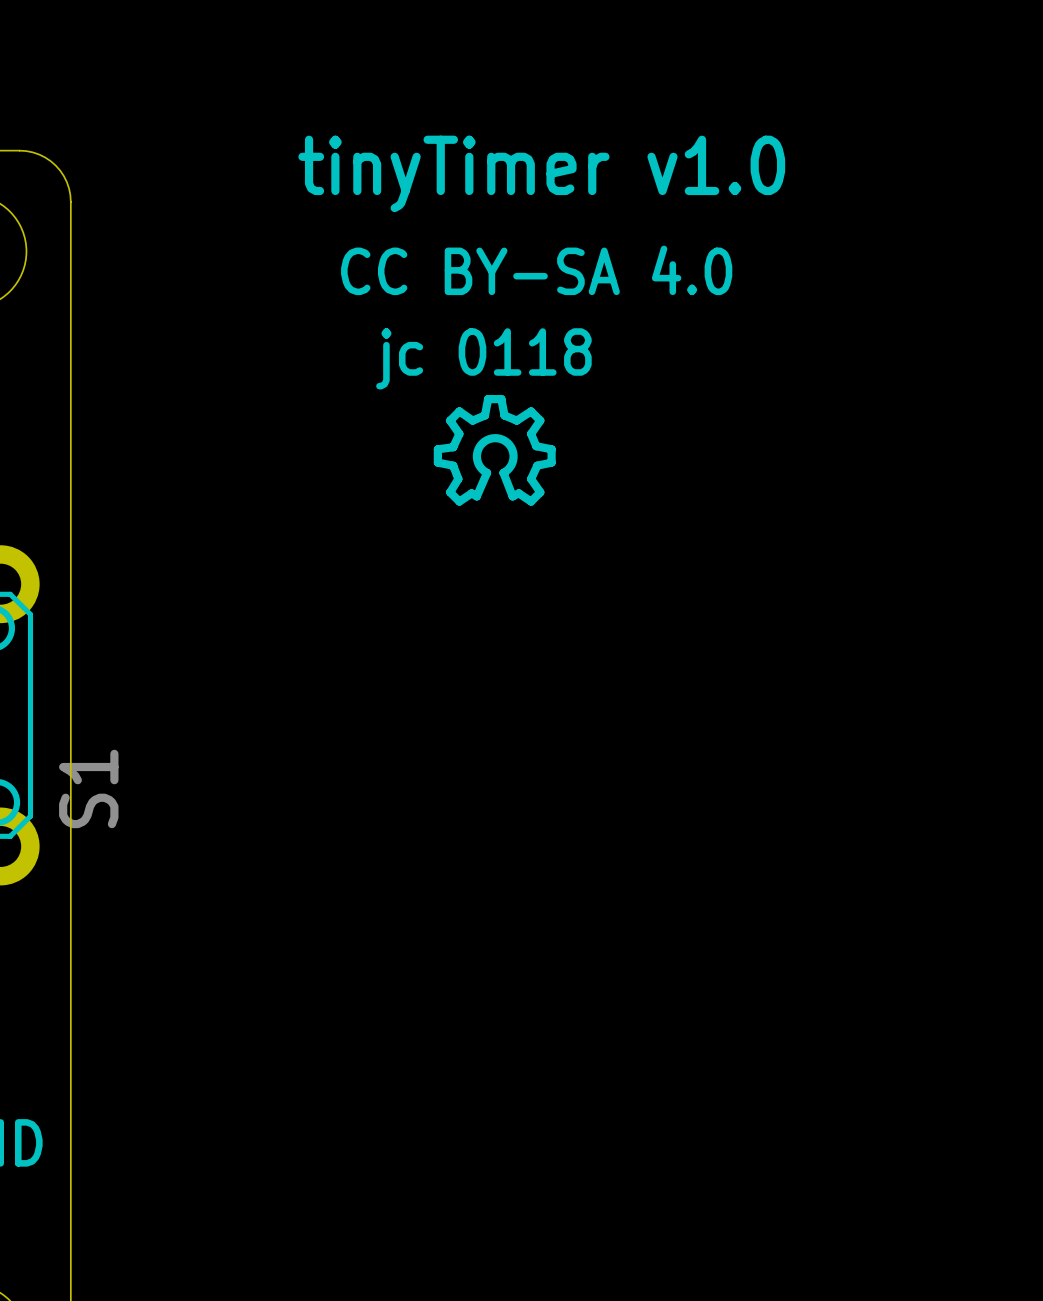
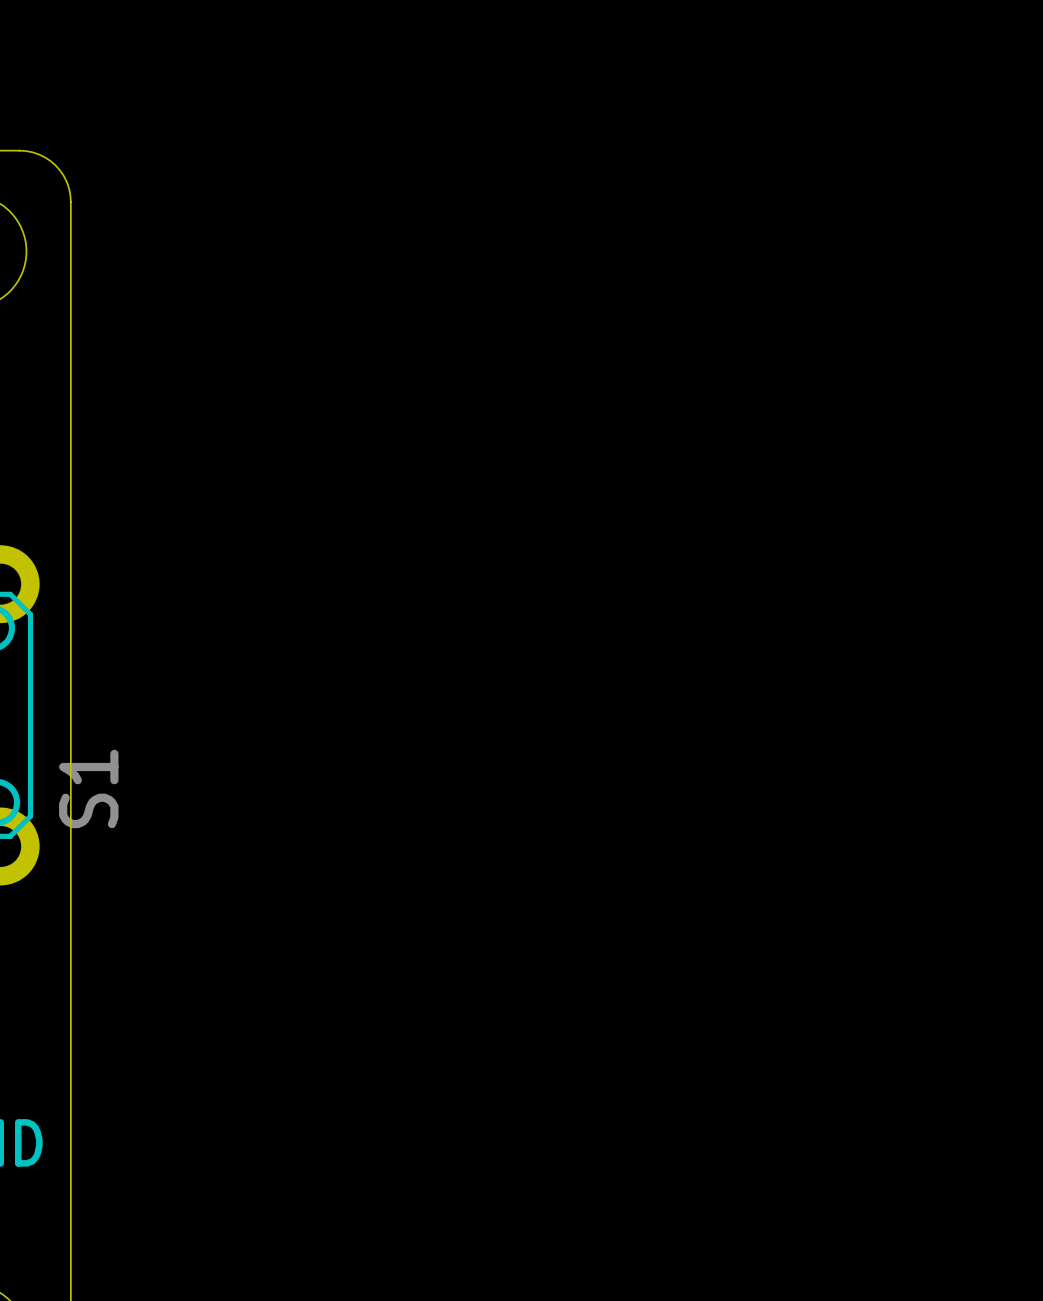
text: tinyTimer v1.0 (541, 173) -> none
text: CC BY-SA 4.0 (536, 270) -> none
text: jc 0118 (483, 358) -> none
drawing: [433, 395, 556, 506] -> none

